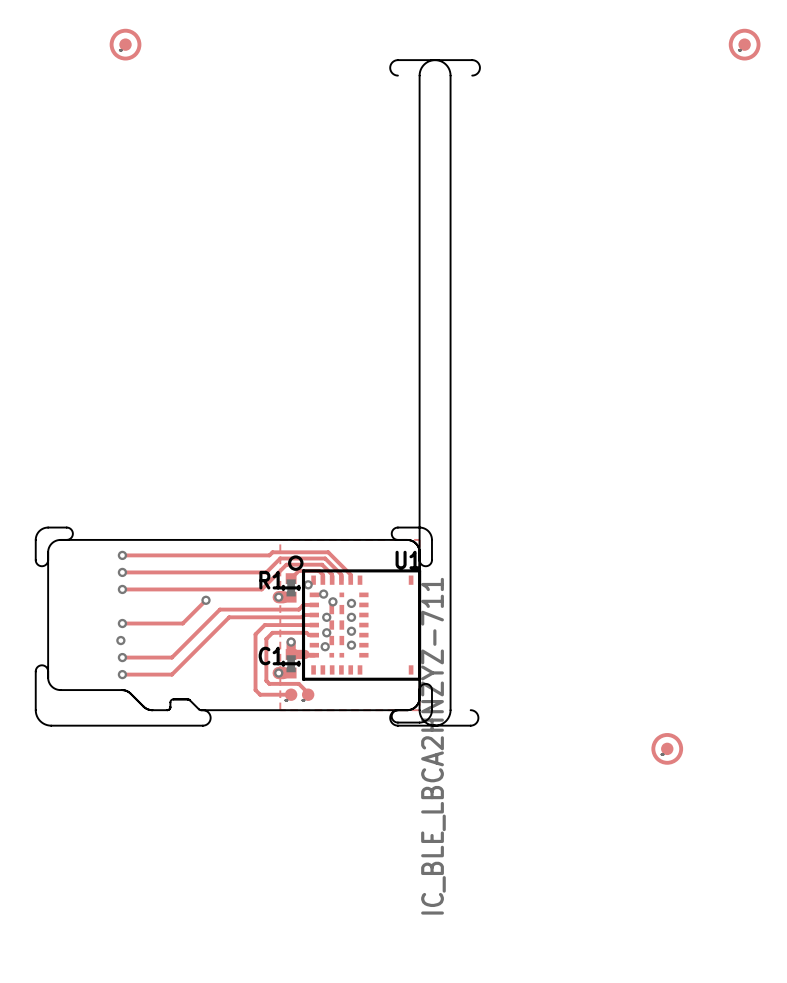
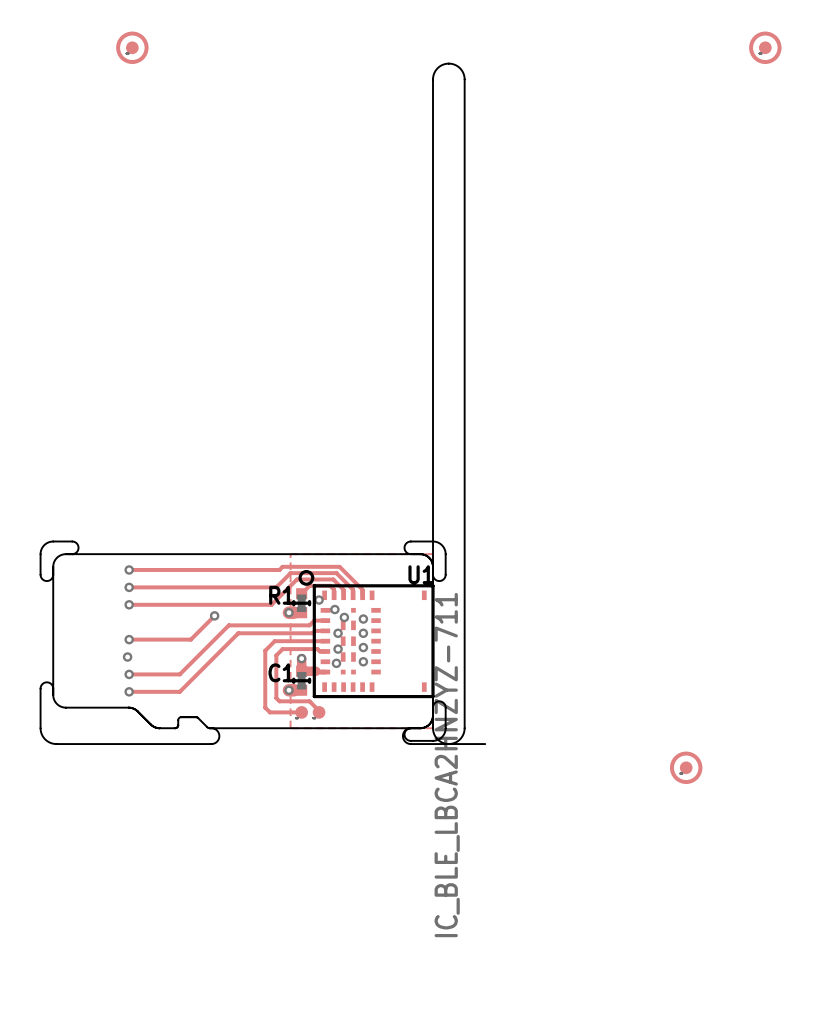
board edge: (397, 75) (392, 73) (390, 67) (392, 62) (397, 60) (474, 60) (478, 63) (479, 68) (477, 73) (472, 75) -> none
board edge: (470, 710) (476, 712) (478, 717) (476, 723) (470, 725) -> none

